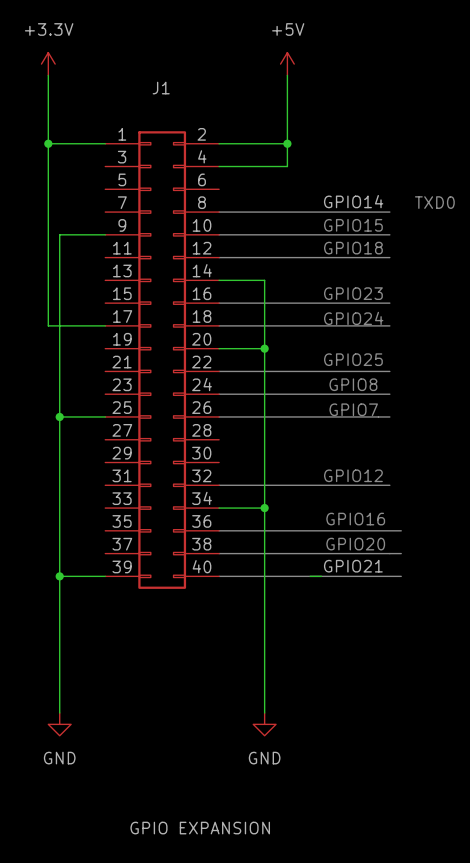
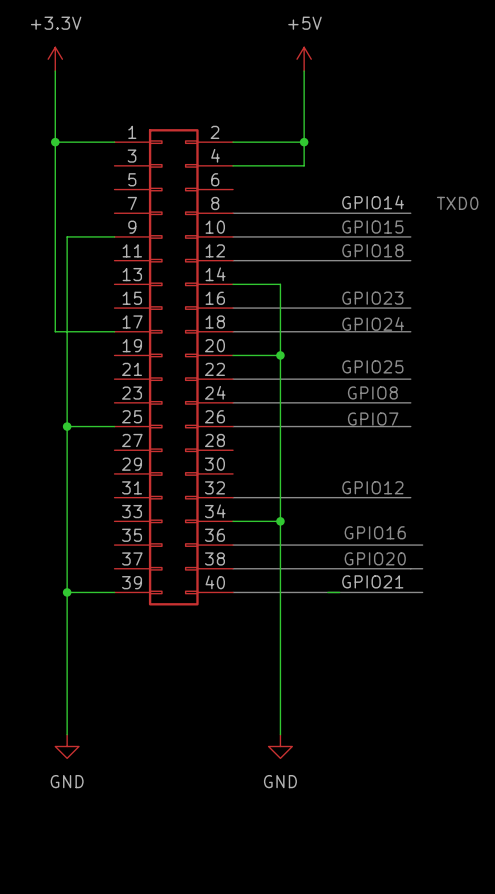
label: J1 (161, 88) -> none
label: GPIO EXPANSION (200, 828) -> none

